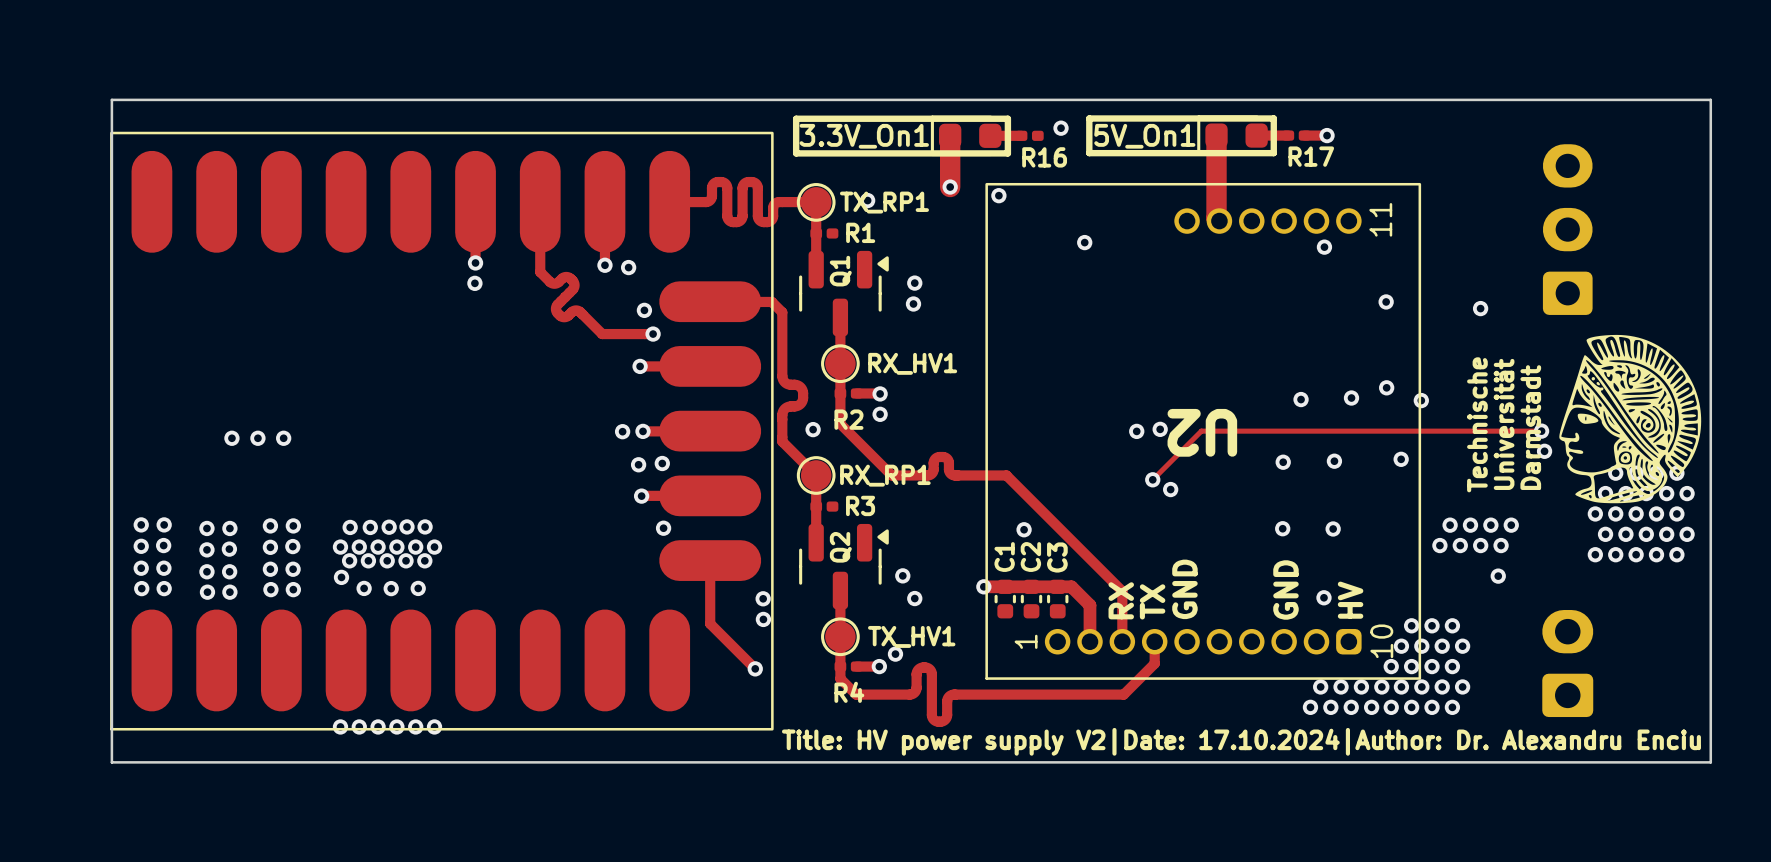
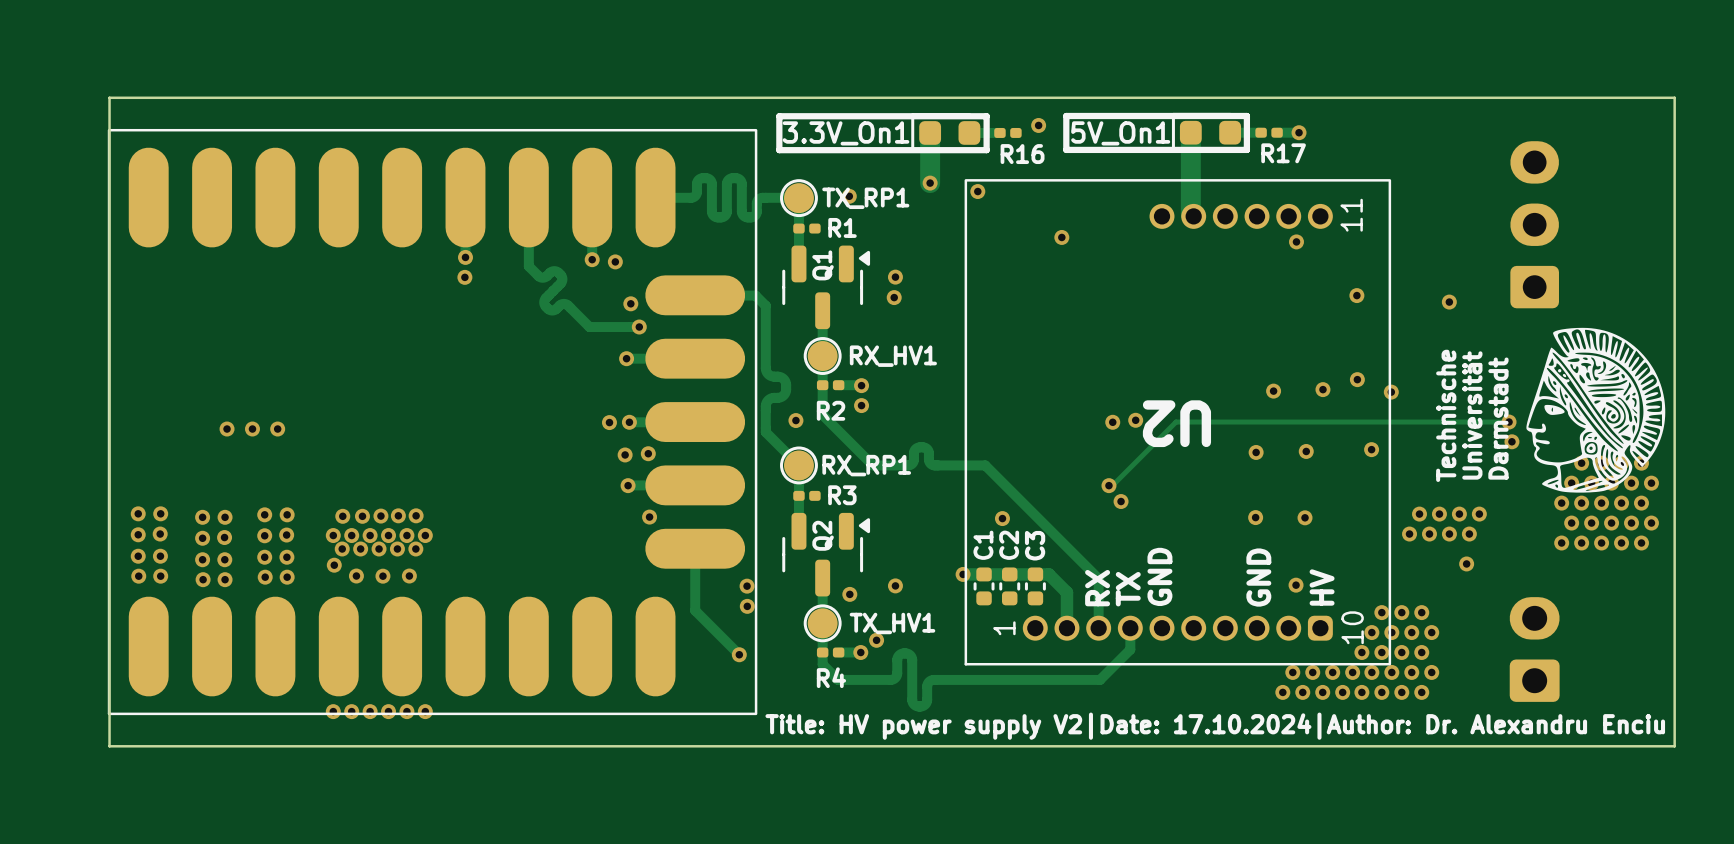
track: none -> (1128, 469) (1112, 485) (1108, 485)
via: (1152, 479) -> none
via: (1170, 489) -> none
via: none -> (1108, 485)
via: none -> (1121, 501)
via position: (902, 575) -> (849, 594)

